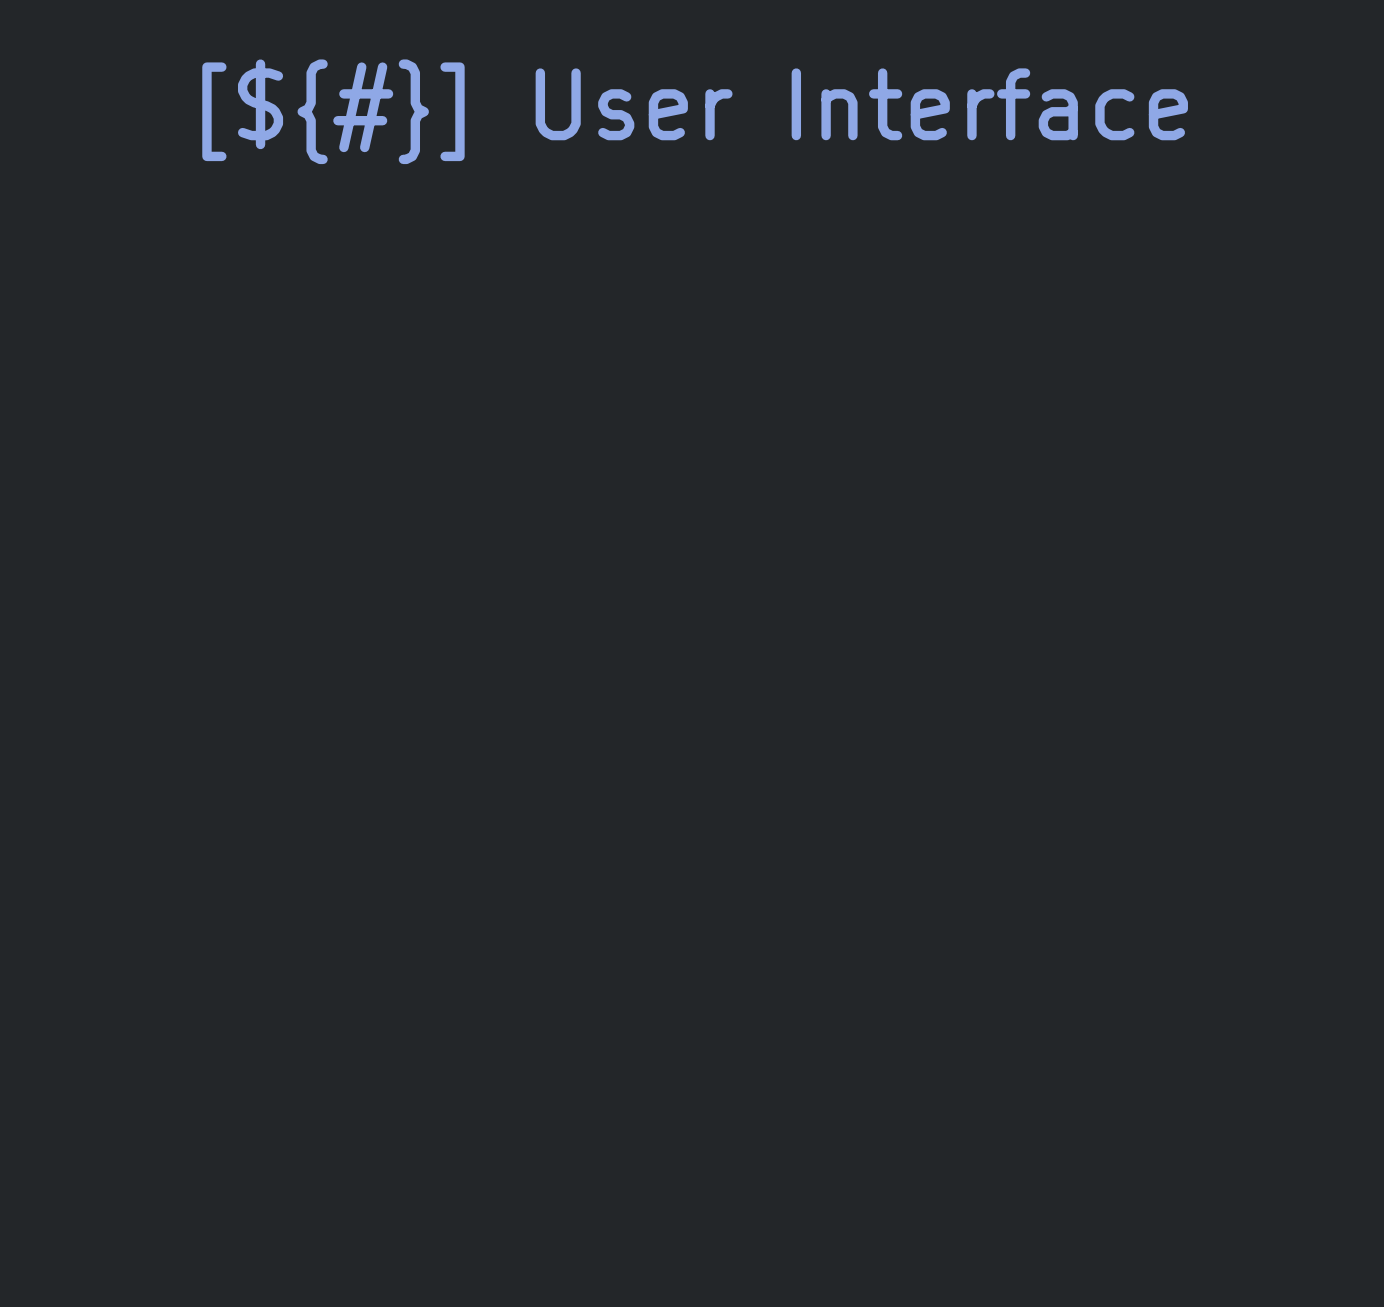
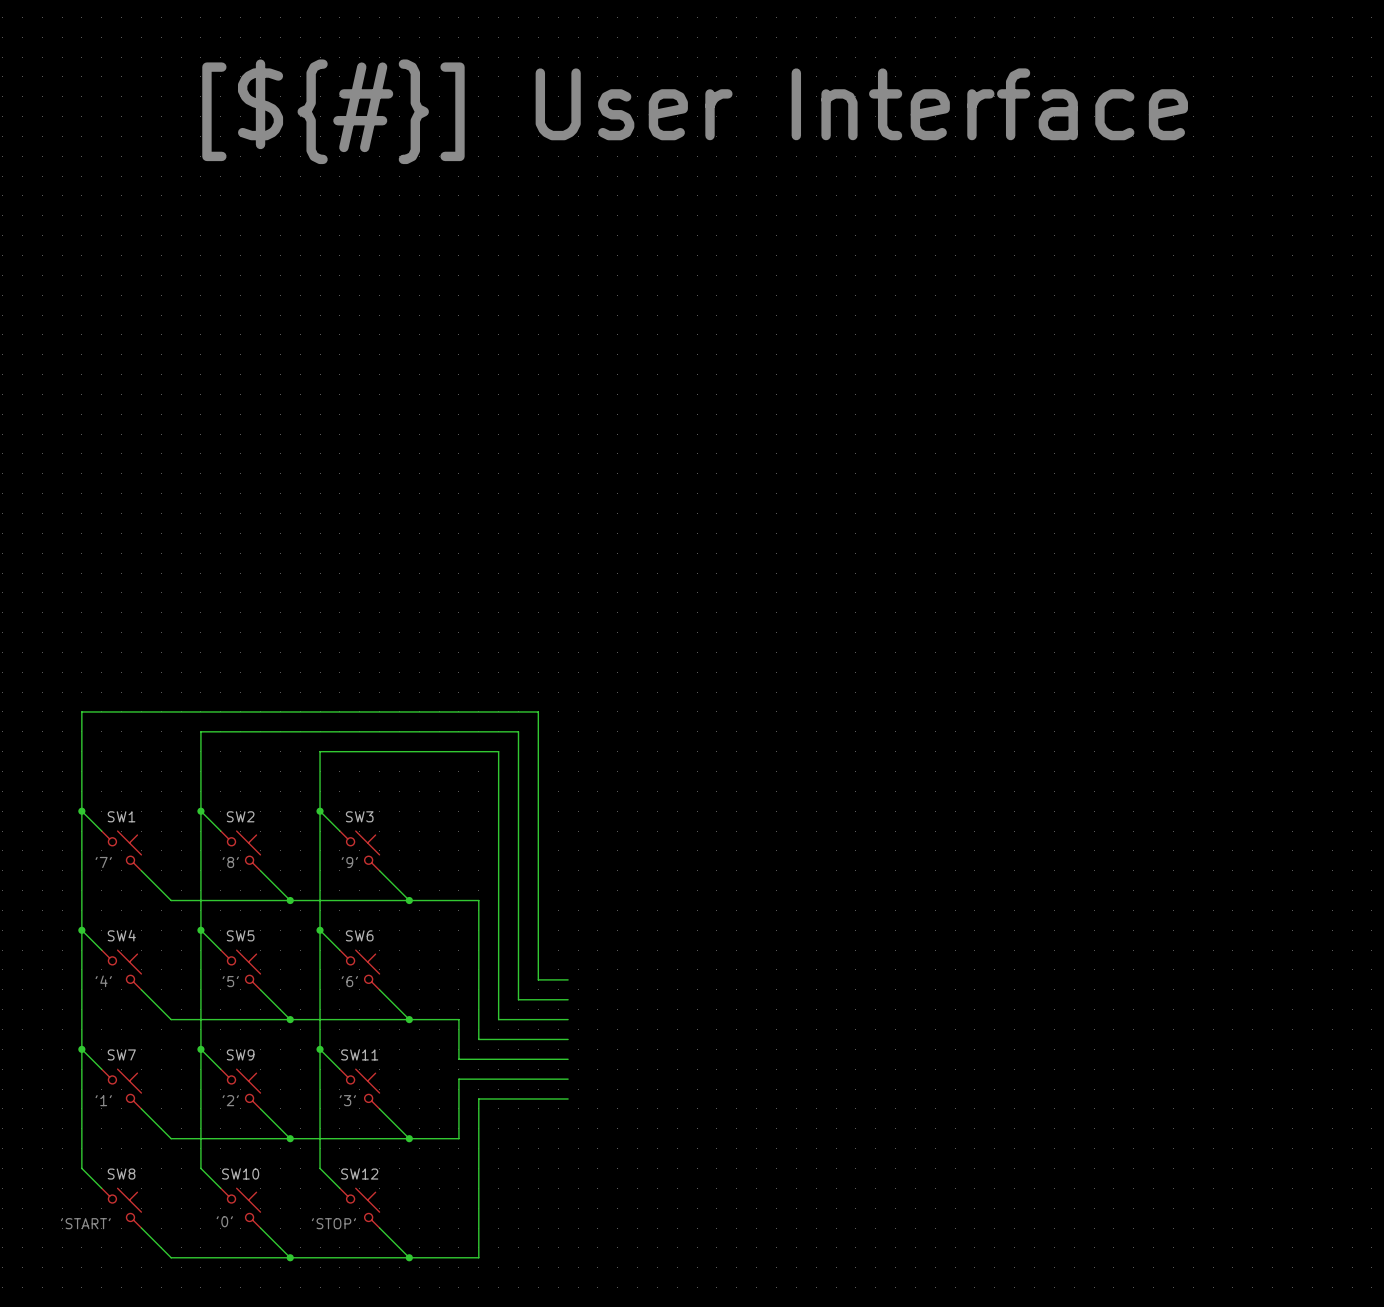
wire: none -> (81, 811) (101, 831)
junction: none -> (81, 811)
wire: none -> (200, 811) (220, 831)
junction: none -> (200, 811)
wire: none -> (320, 811) (339, 831)
junction: none -> (320, 811)
SW1: none -> (121, 850)
SW2: none -> (240, 850)
SW3: none -> (359, 850)
text: none -> '7' (103, 862)
text: none -> '8' (230, 862)
text: none -> '9' (349, 862)
wire: none -> (141, 870) (171, 900) (478, 900) (478, 1039) (568, 1039)
wire: none -> (260, 870) (290, 900)
wire: none -> (379, 870) (409, 900)
junction: none -> (290, 900)
junction: none -> (409, 900)
wire: none -> (81, 930) (101, 950)
junction: none -> (81, 930)
wire: none -> (200, 930) (220, 950)
junction: none -> (200, 930)
wire: none -> (320, 930) (339, 950)
junction: none -> (320, 930)
SW4: none -> (121, 969)
SW5: none -> (240, 969)
SW6: none -> (359, 969)
wire: none -> (568, 979) (538, 979) (538, 711) (81, 711) (81, 1168) (101, 1188)
text: none -> '4' (103, 981)
text: none -> '5' (230, 981)
text: none -> '6' (349, 981)
wire: none -> (141, 989) (171, 1019) (458, 1019) (458, 1059) (568, 1059)
wire: none -> (260, 989) (290, 1019)
wire: none -> (379, 989) (409, 1019)
wire: none -> (568, 999) (518, 999) (518, 731) (200, 731) (200, 1168) (220, 1188)
junction: none -> (290, 1019)
junction: none -> (409, 1019)
wire: none -> (568, 1019) (498, 1019) (498, 751) (320, 751) (320, 1168) (339, 1188)
wire: none -> (81, 1049) (101, 1069)
junction: none -> (81, 1049)
wire: none -> (200, 1049) (220, 1069)
junction: none -> (200, 1049)
wire: none -> (320, 1049) (339, 1069)
junction: none -> (320, 1049)
wire: none -> (568, 1079) (458, 1079) (458, 1138) (171, 1138) (141, 1108)
SW7: none -> (121, 1089)
SW9: none -> (240, 1089)
SW11: none -> (359, 1089)
wire: none -> (568, 1098) (478, 1098) (478, 1257) (171, 1257) (141, 1228)
text: none -> '1' (103, 1100)
text: none -> '2' (230, 1100)
text: none -> '3' (347, 1100)
wire: none -> (260, 1108) (290, 1138)
wire: none -> (379, 1108) (409, 1138)
junction: none -> (290, 1138)
junction: none -> (409, 1138)
SW8: none -> (121, 1208)
SW10: none -> (240, 1208)
SW12: none -> (359, 1208)
text: none -> '0' (224, 1221)
text: none -> 'START' (85, 1223)
text: none -> 'STOP' (333, 1223)
wire: none -> (260, 1228) (290, 1257)
wire: none -> (379, 1228) (409, 1257)
junction: none -> (290, 1257)
junction: none -> (409, 1257)

